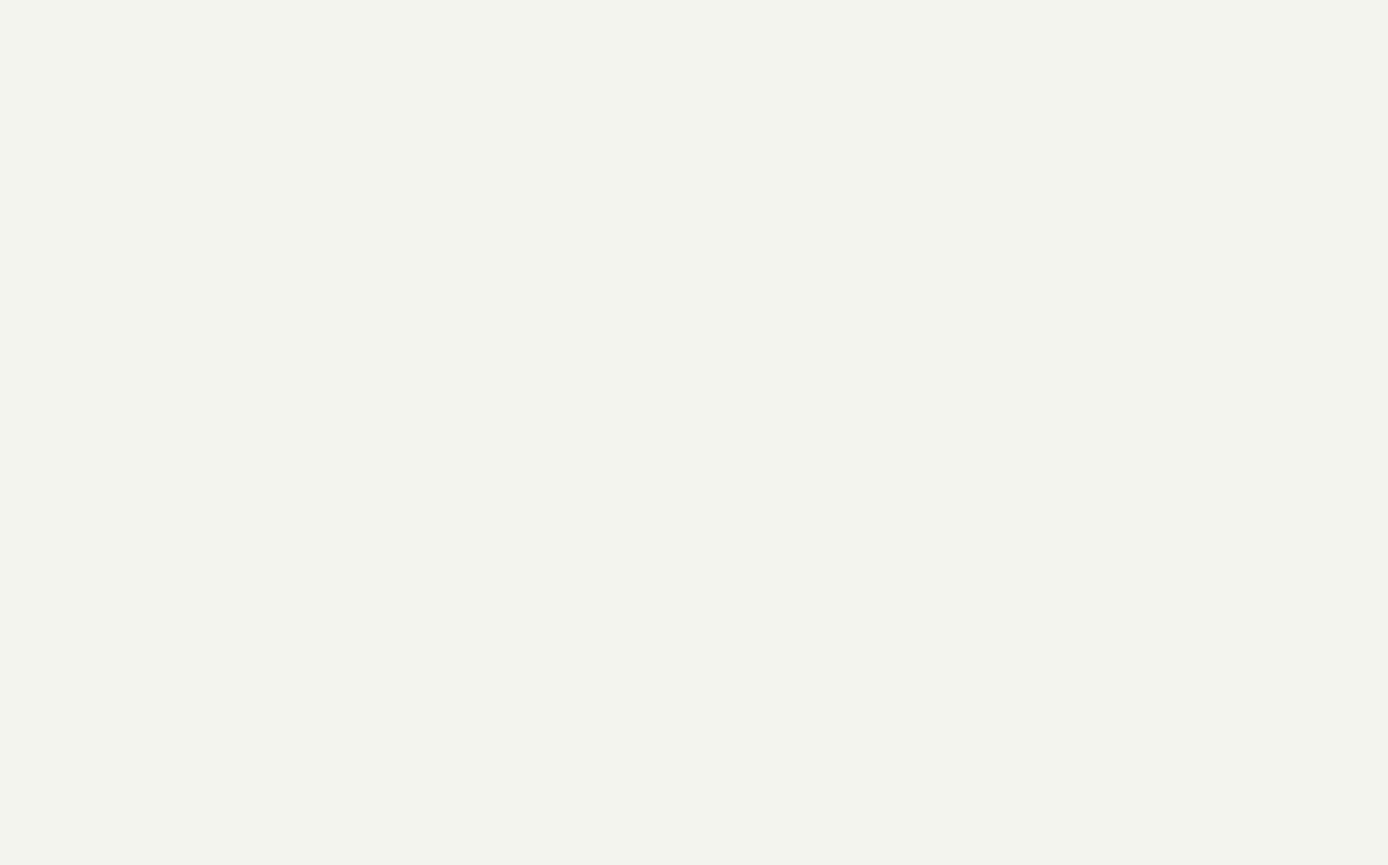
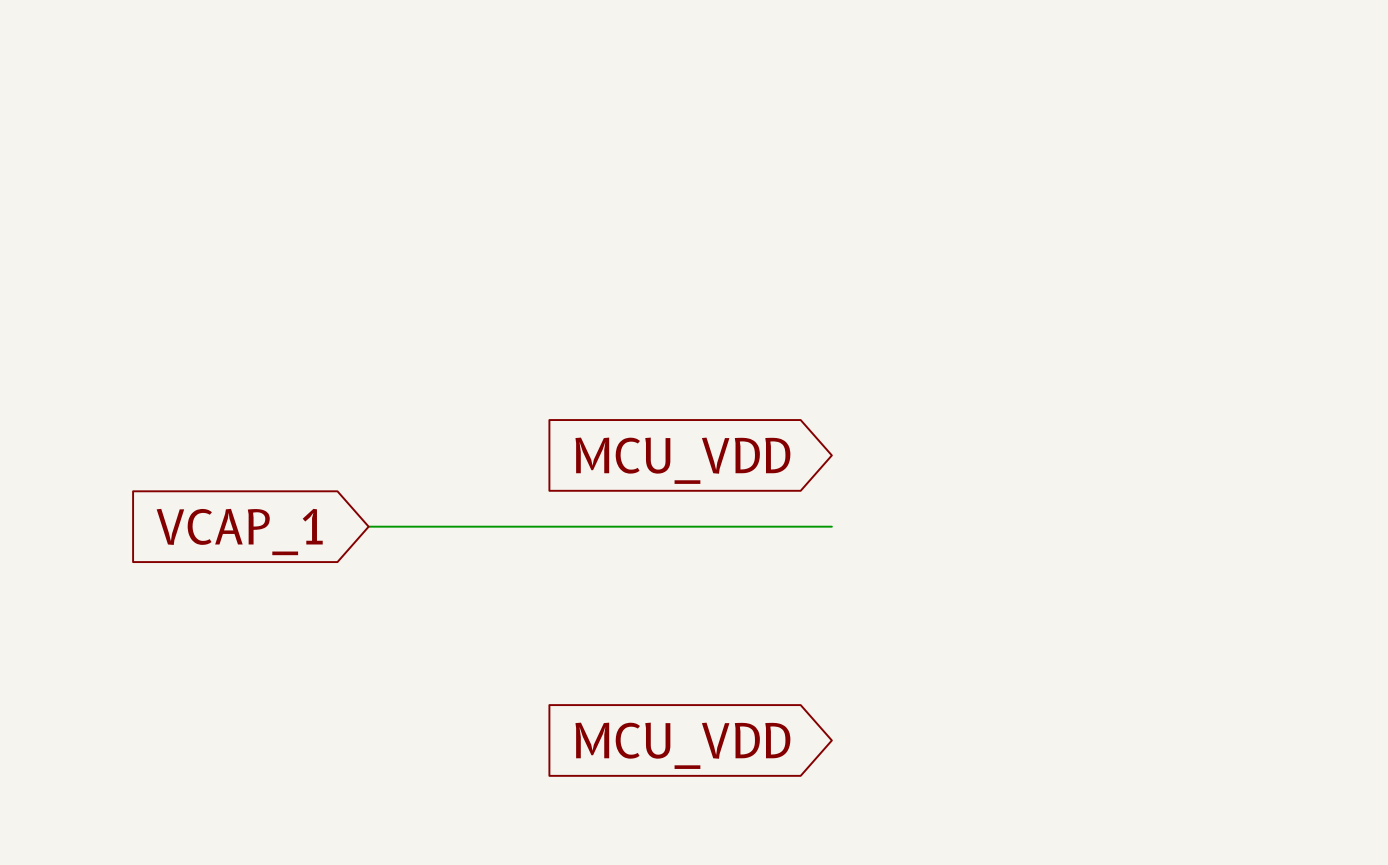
global label: none -> MCU_VDD (682, 460)
wire: none -> (368, 526) (831, 526)
global label: none -> VCAP_1 (239, 532)
global label: none -> MCU_VDD (682, 745)

